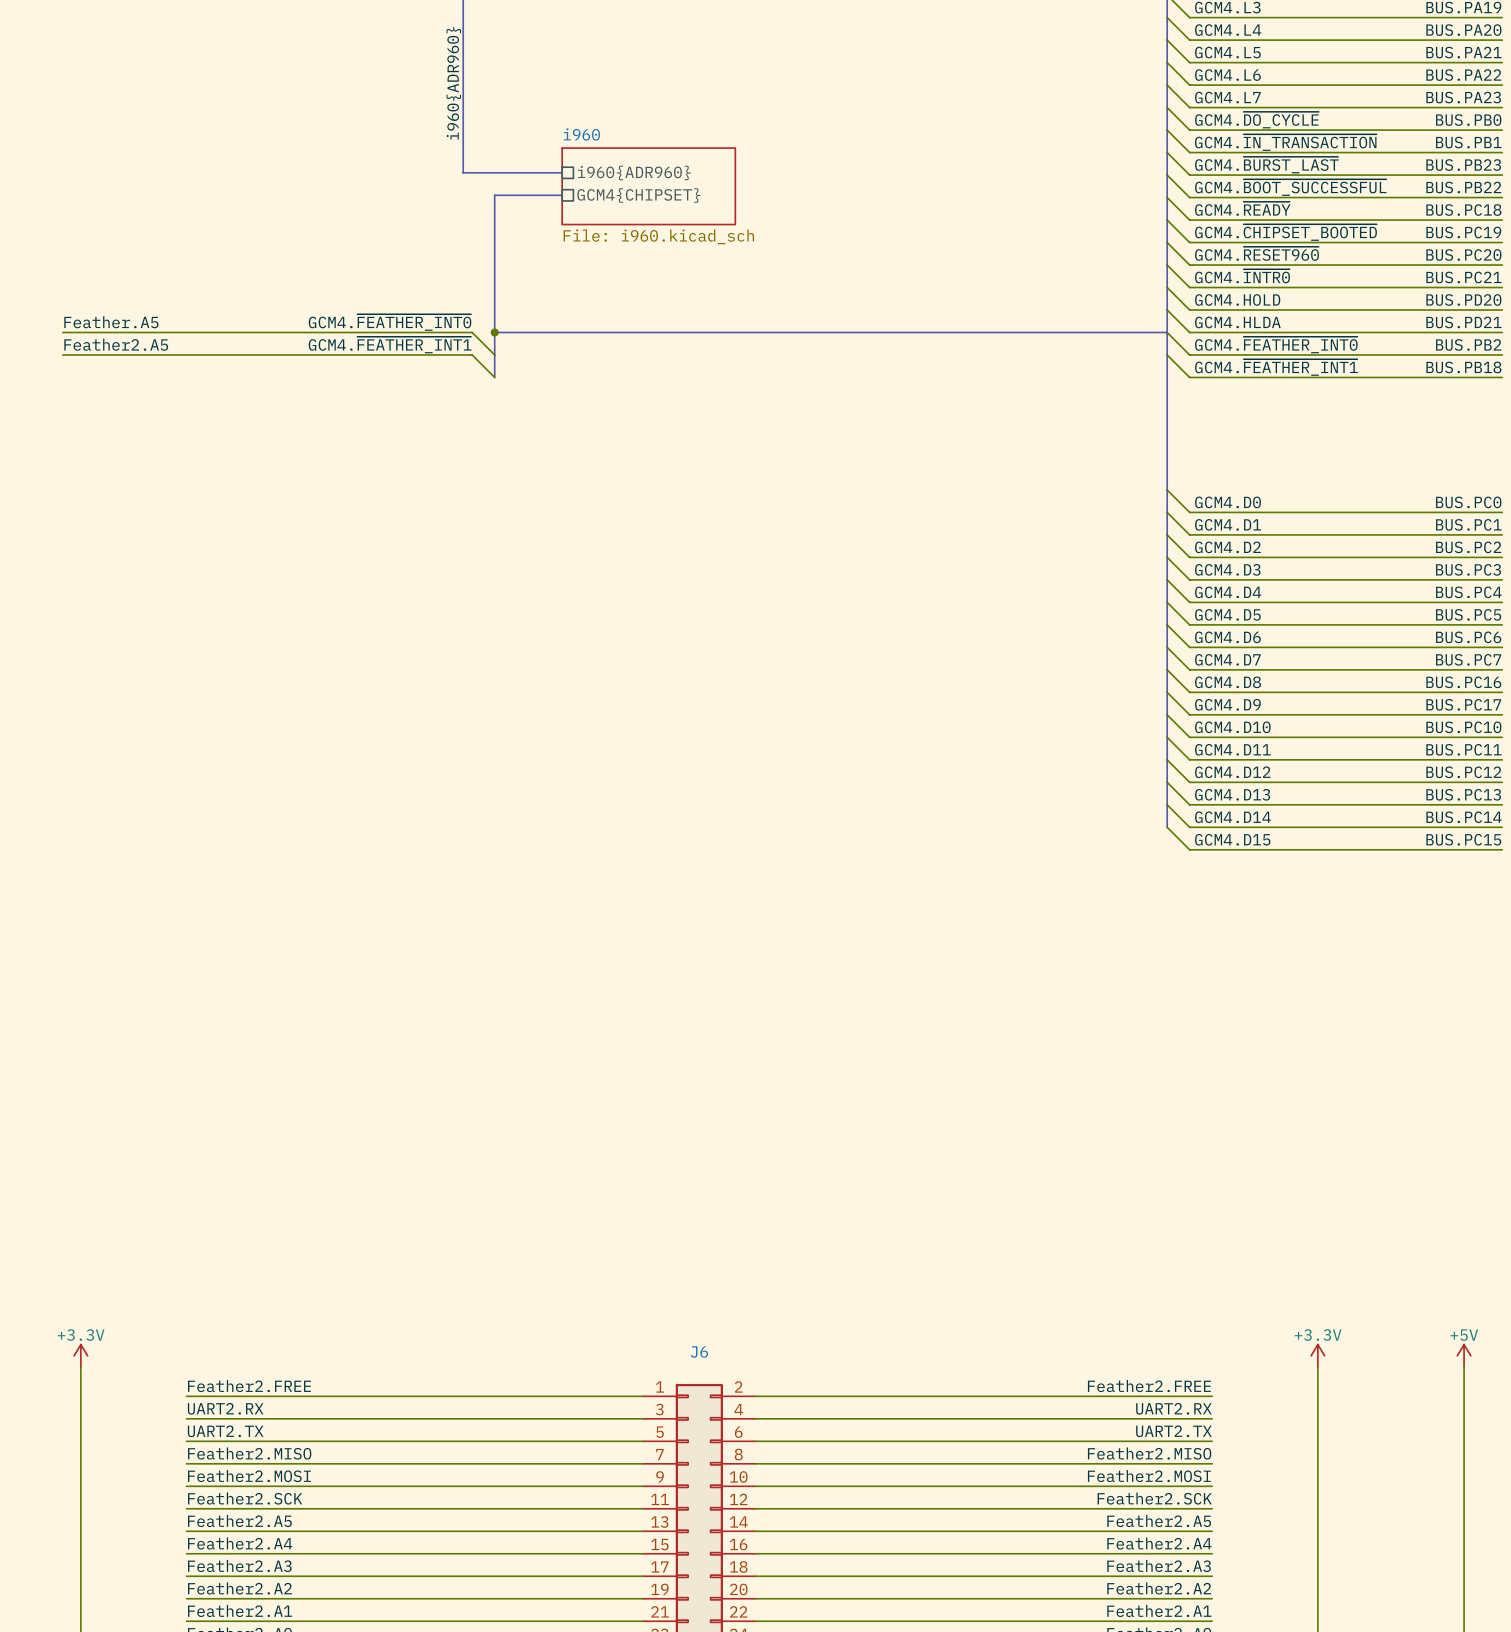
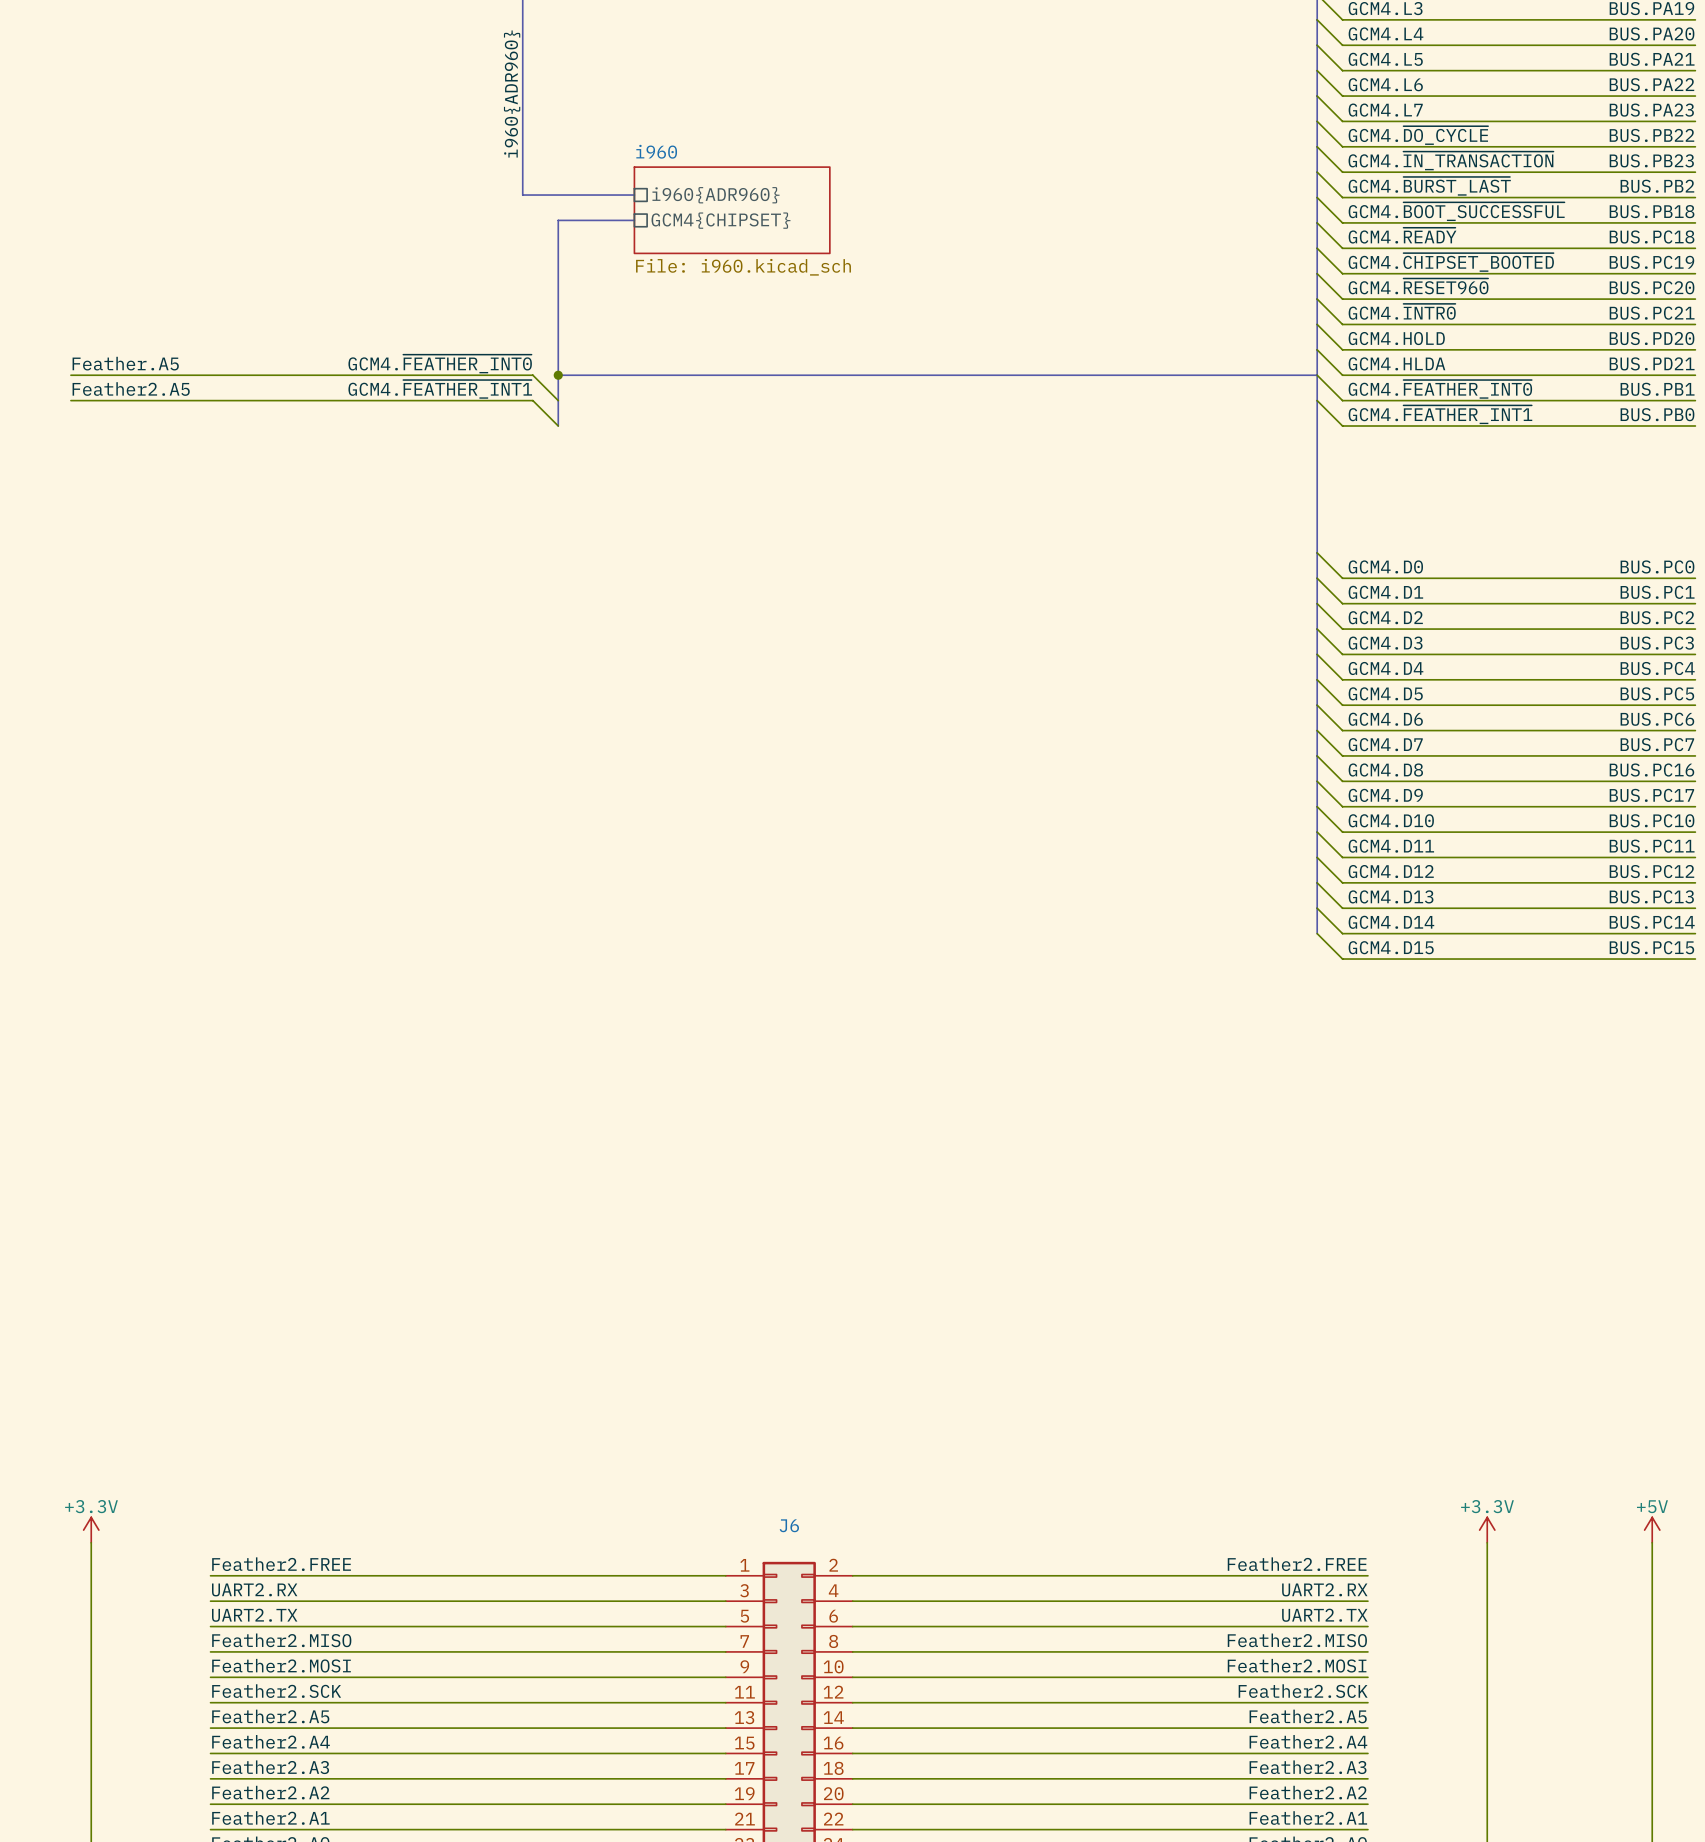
label: BUS.PB0 (1468, 120) -> BUS.PB22 (1651, 135)
label: BUS.PB1 (1468, 142) -> BUS.PB23 (1651, 160)
label: BUS.PB23 (1463, 165) -> BUS.PB2 (1657, 186)
label: BUS.PB22 (1463, 187) -> BUS.PB18 (1652, 211)
label: BUS.PB2 (1468, 344) -> BUS.PB1 (1657, 389)
label: BUS.PB18 (1463, 367) -> BUS.PB0 (1657, 414)

